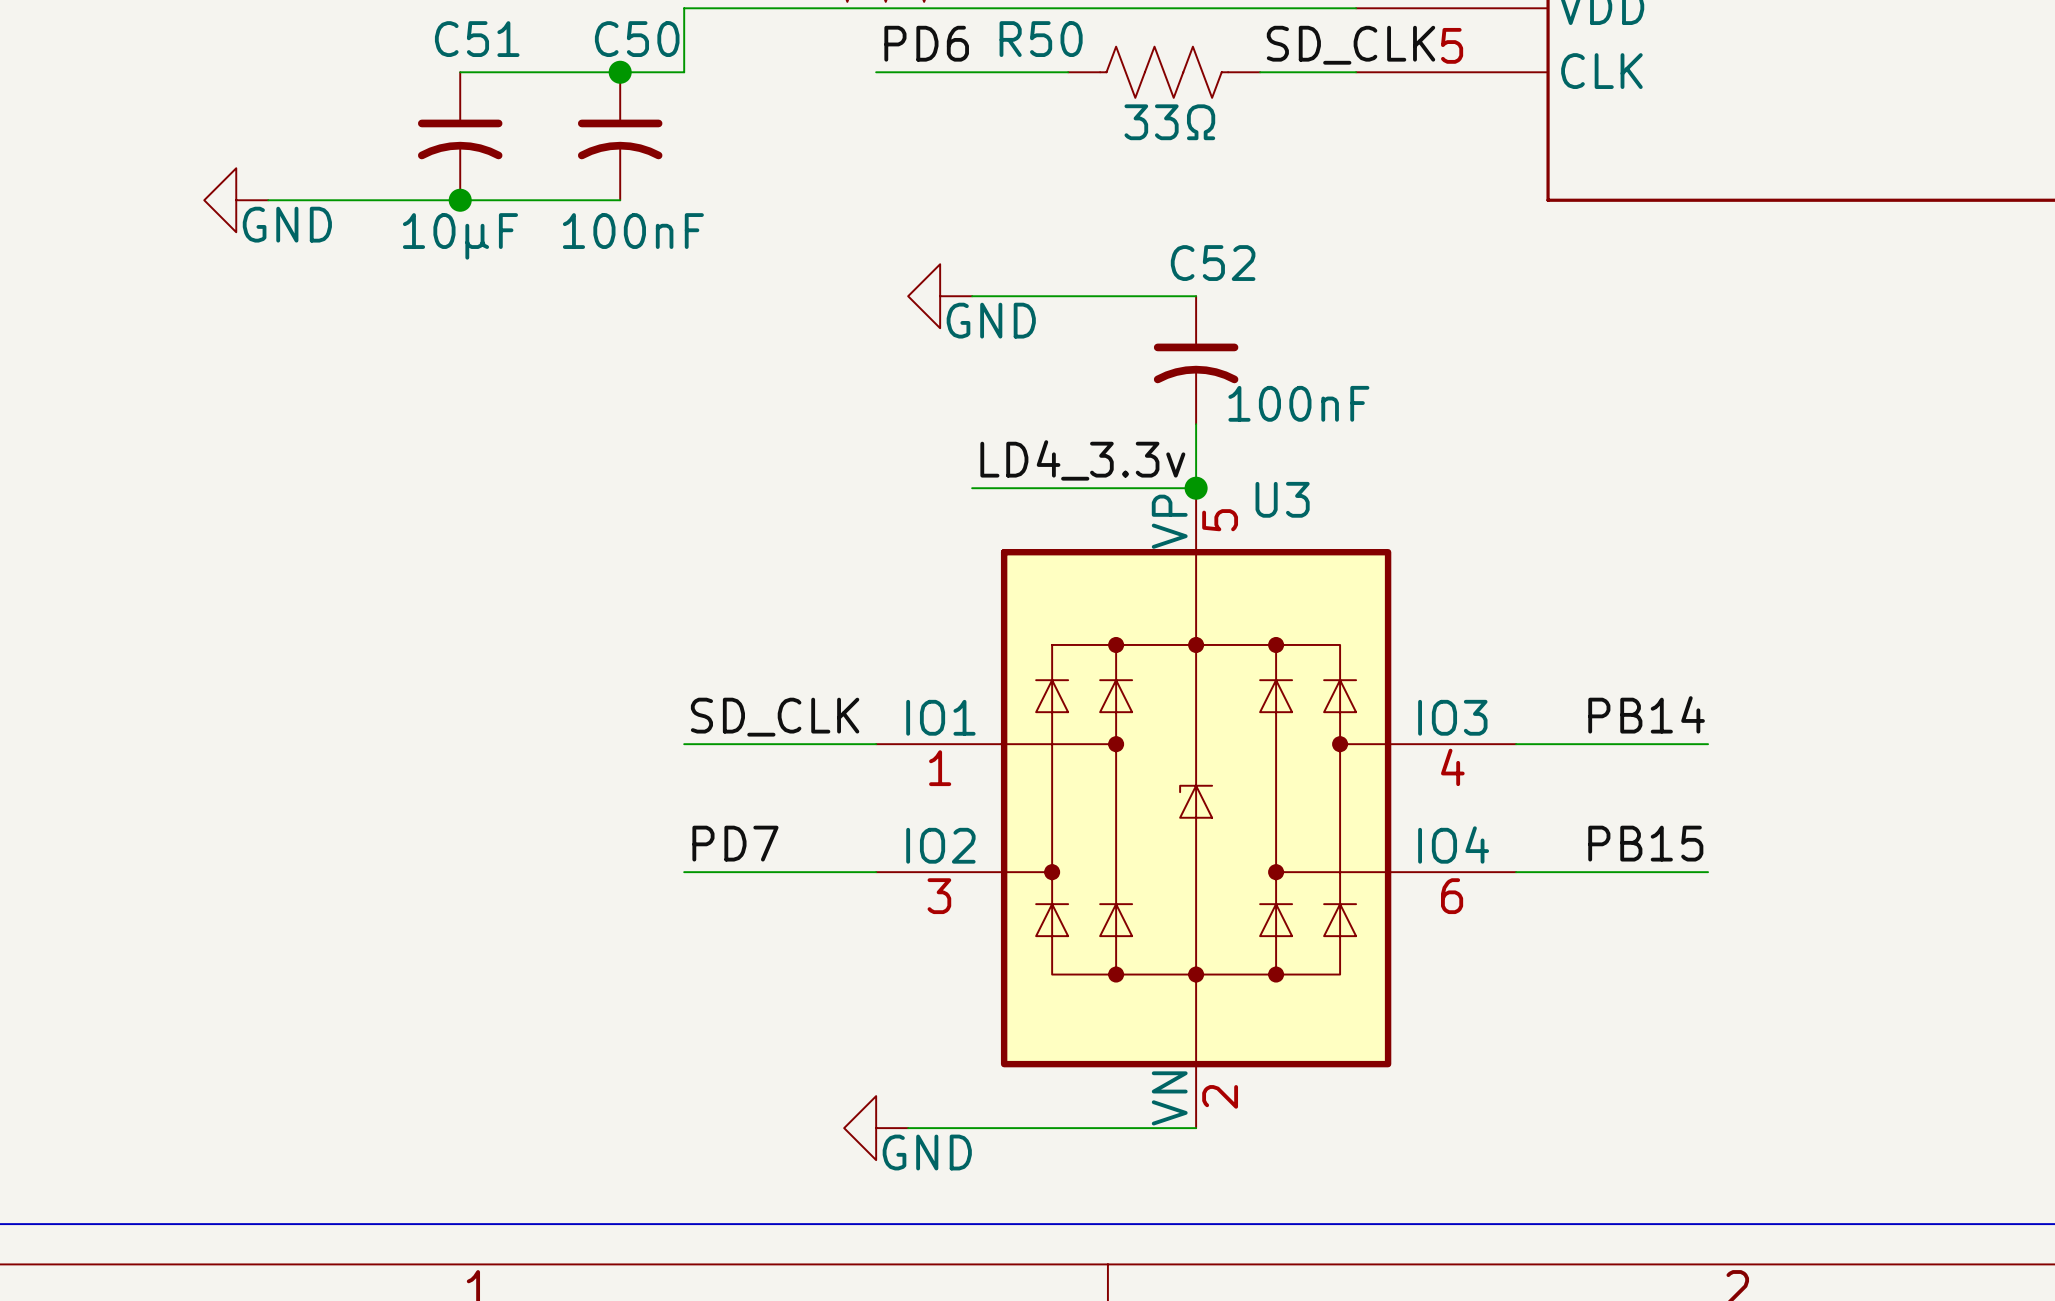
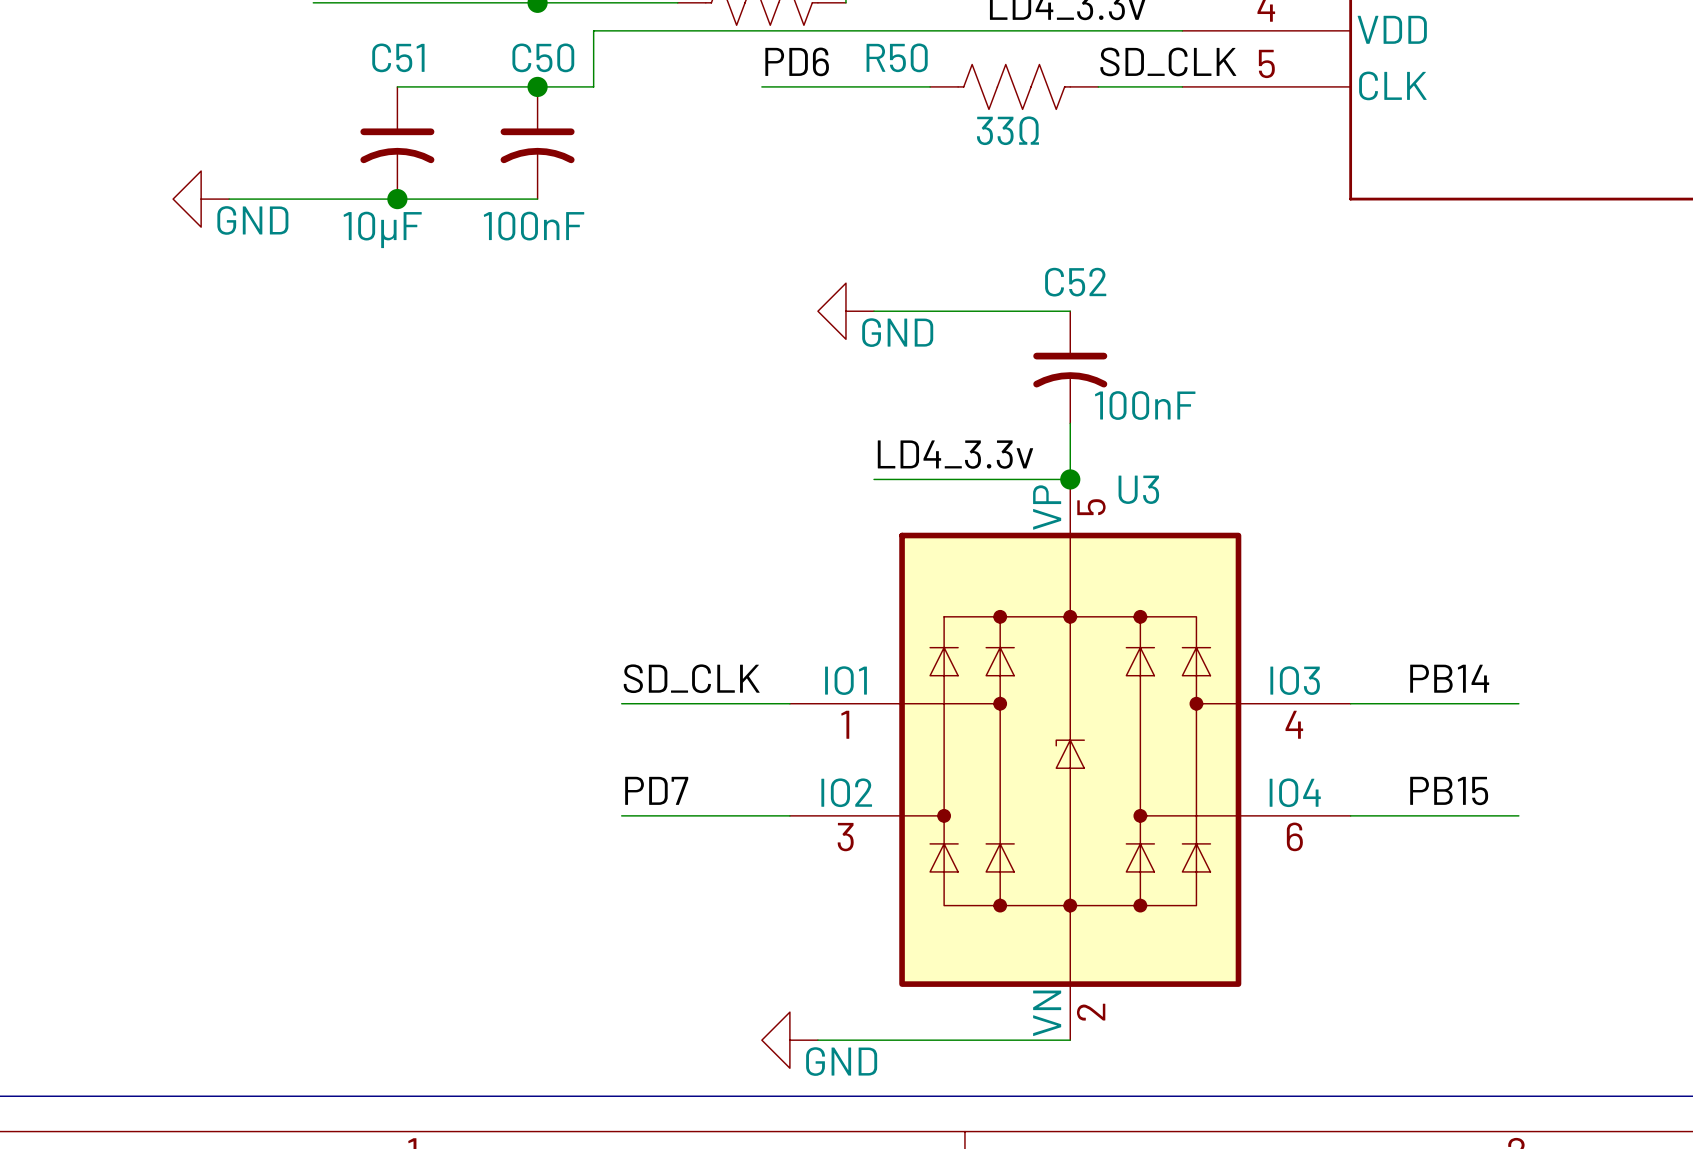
power symbol position: GND (940, 296) -> GND (845, 311)
wire: (972, 296) (1196, 296) -> (874, 311) (1070, 311)
C52 position: (1196, 360) -> (1070, 367)
wire: (1196, 424) (1196, 488) (972, 488) -> (1070, 423) (1070, 479) (874, 479)
label position: LD4_3.3v (1082, 460) -> LD4_3.3v (955, 454)
junction position: (1196, 488) -> (1070, 479)
label position: PB14 (1646, 714) -> PB14 (1449, 678)
label position: SD_CLK (775, 717) -> SD_CLK (691, 678)
wire: (684, 744) (876, 744) -> (621, 703) (789, 703)
wire: (1516, 744) (1708, 744) -> (1350, 703) (1518, 703)
U3 position: (1196, 808) -> (1070, 759)
label position: PD7 (735, 843) -> PD7 (656, 790)
label position: PB15 (1645, 843) -> PB15 (1449, 790)
wire: (684, 872) (876, 872) -> (621, 815) (789, 815)
wire: (1516, 872) (1708, 872) -> (1350, 815) (1518, 815)
power symbol position: GND (876, 1128) -> GND (789, 1040)
wire: (908, 1128) (1196, 1128) -> (817, 1040) (1070, 1040)

